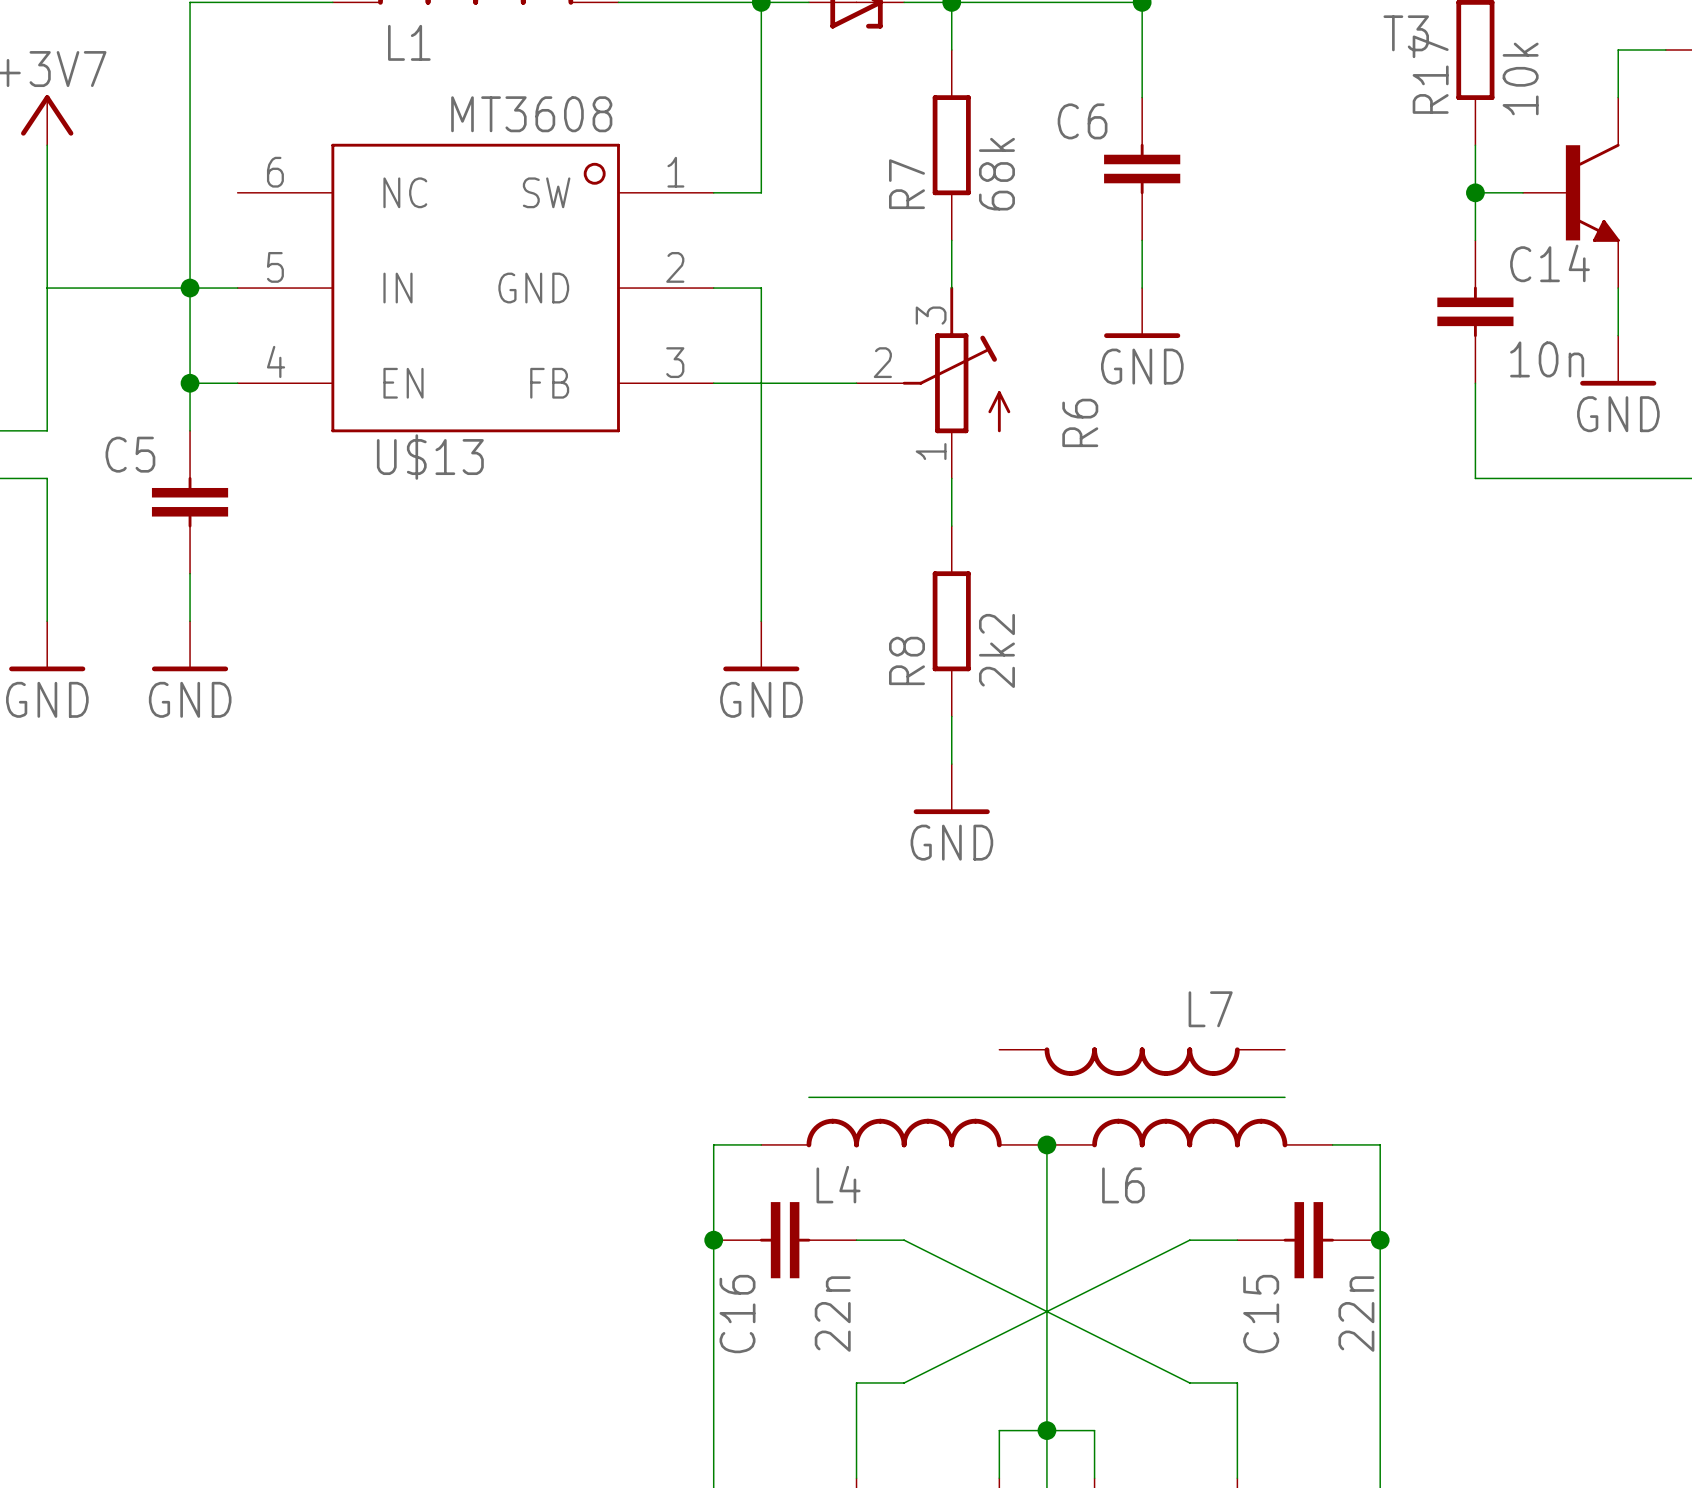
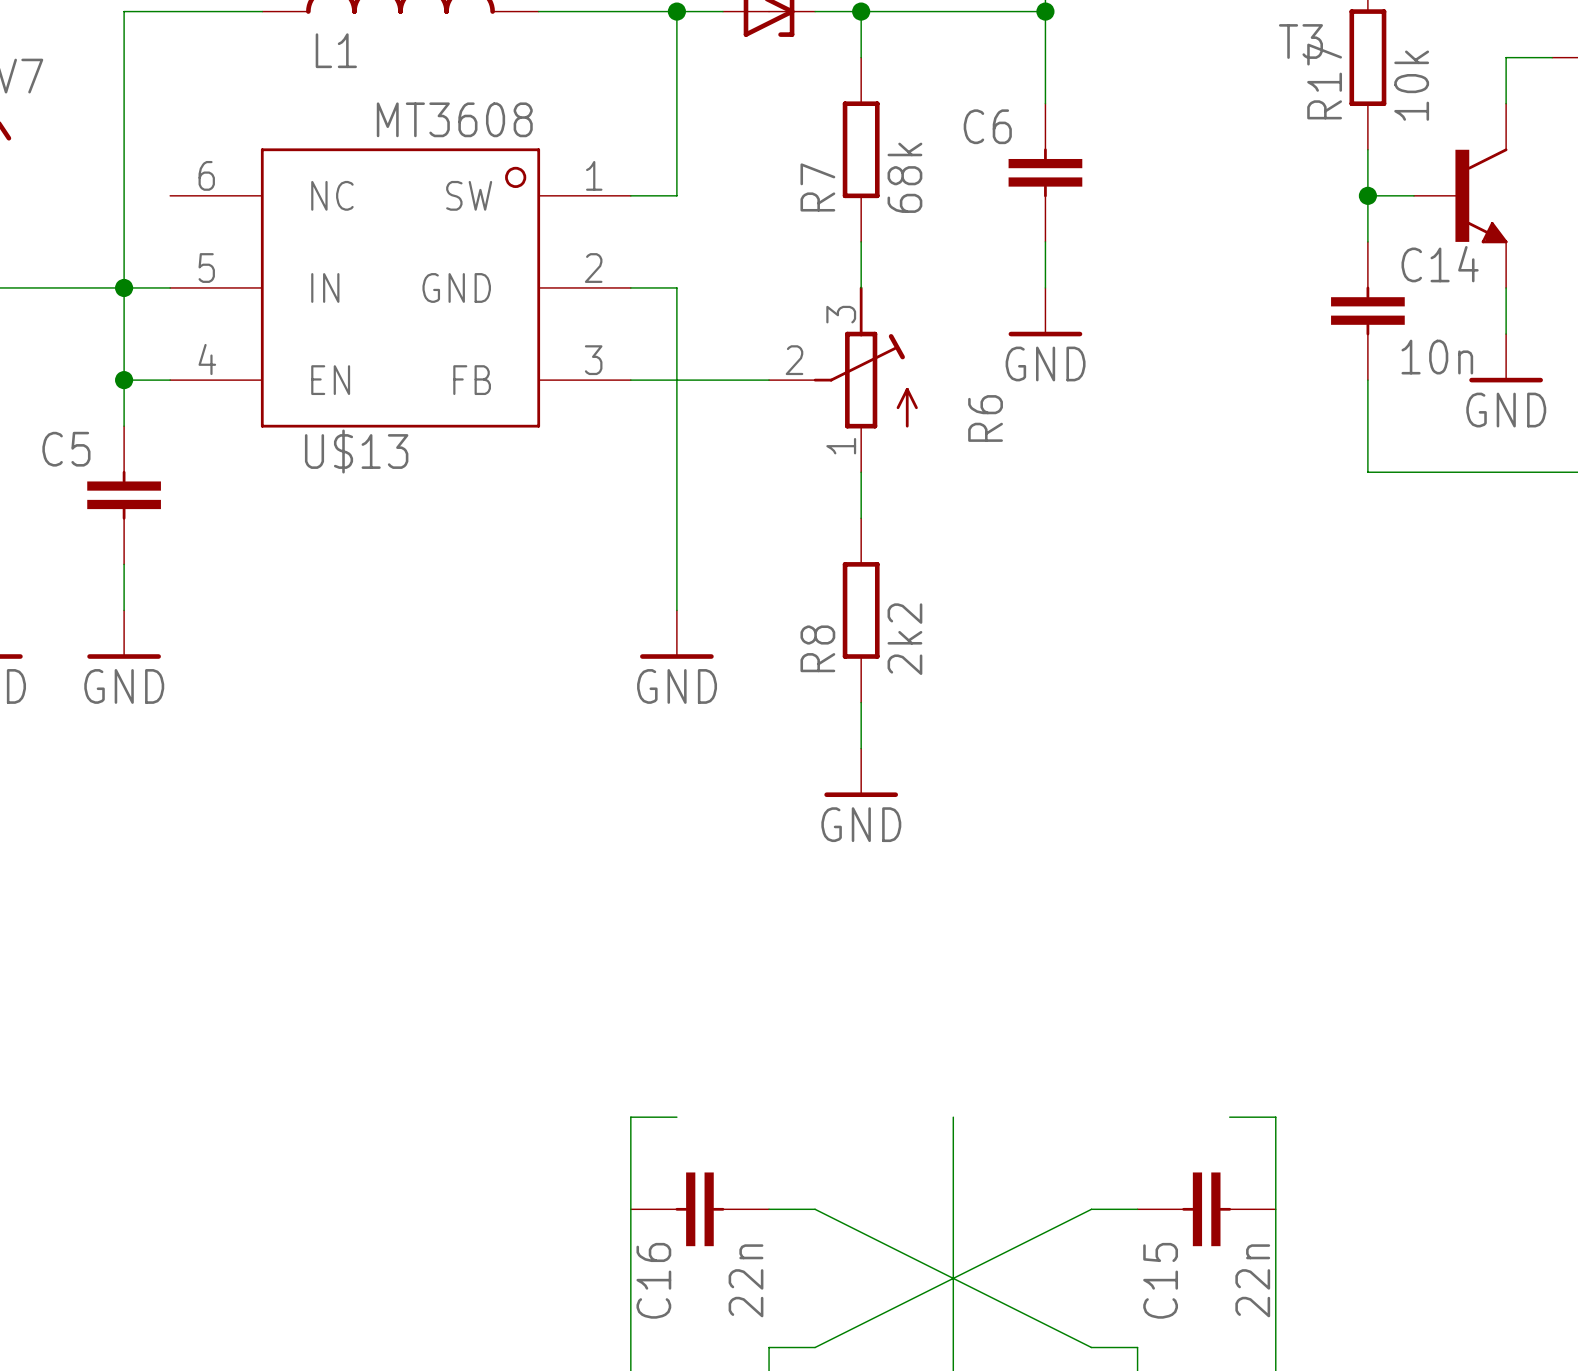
L7: (1142, 1061) -> none
wire: (808, 1097) (1284, 1097) -> none
L4: (904, 1133) -> none
L6: (1189, 1133) -> none
junction: (1046, 1144) -> none
junction: (713, 1240) -> none
junction: (1380, 1240) -> none

